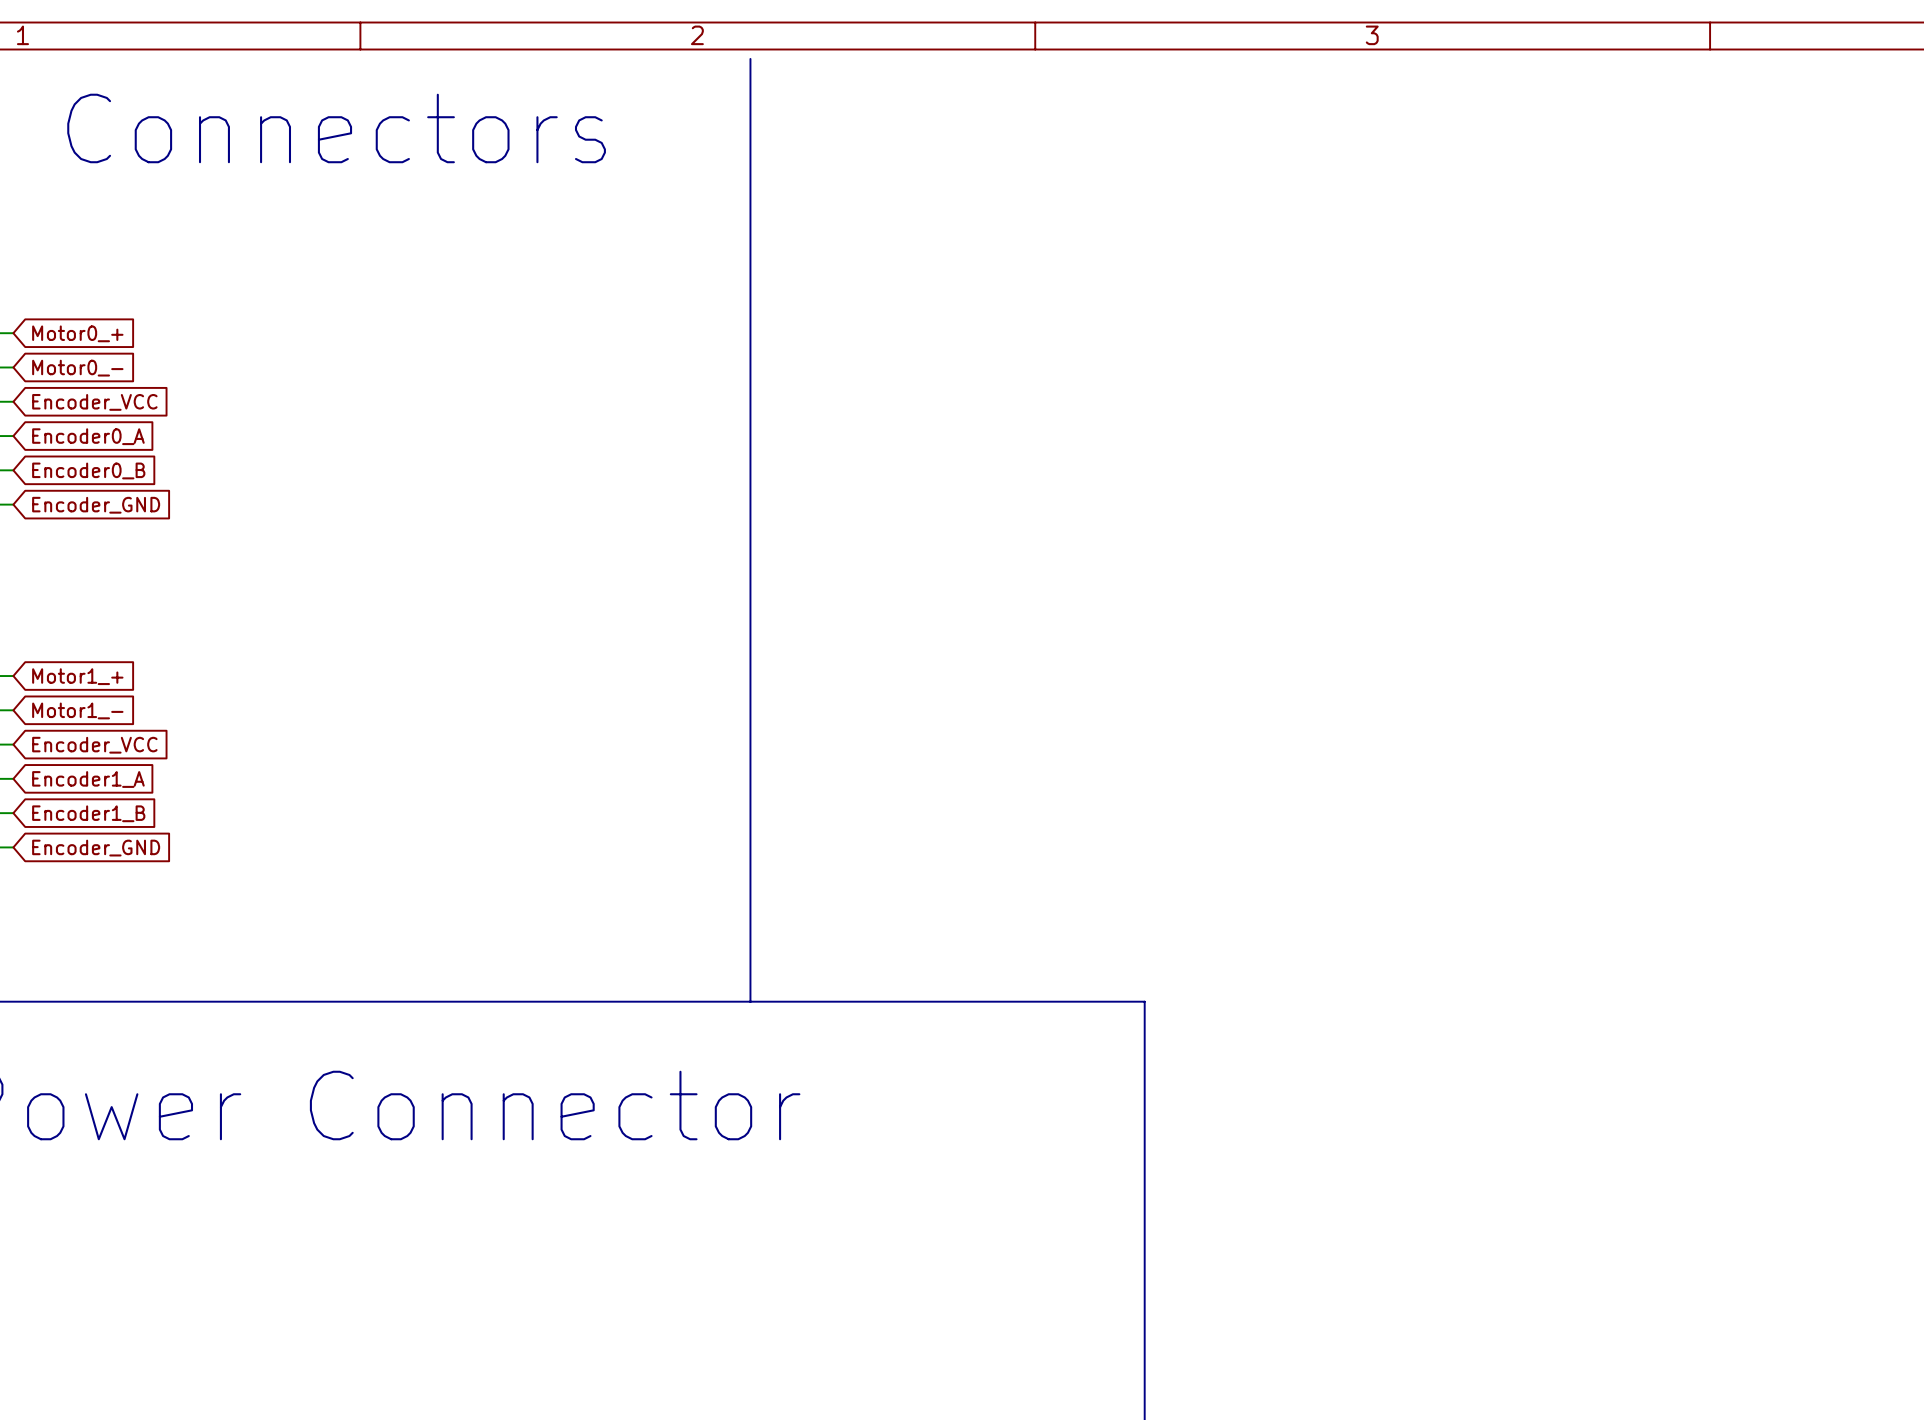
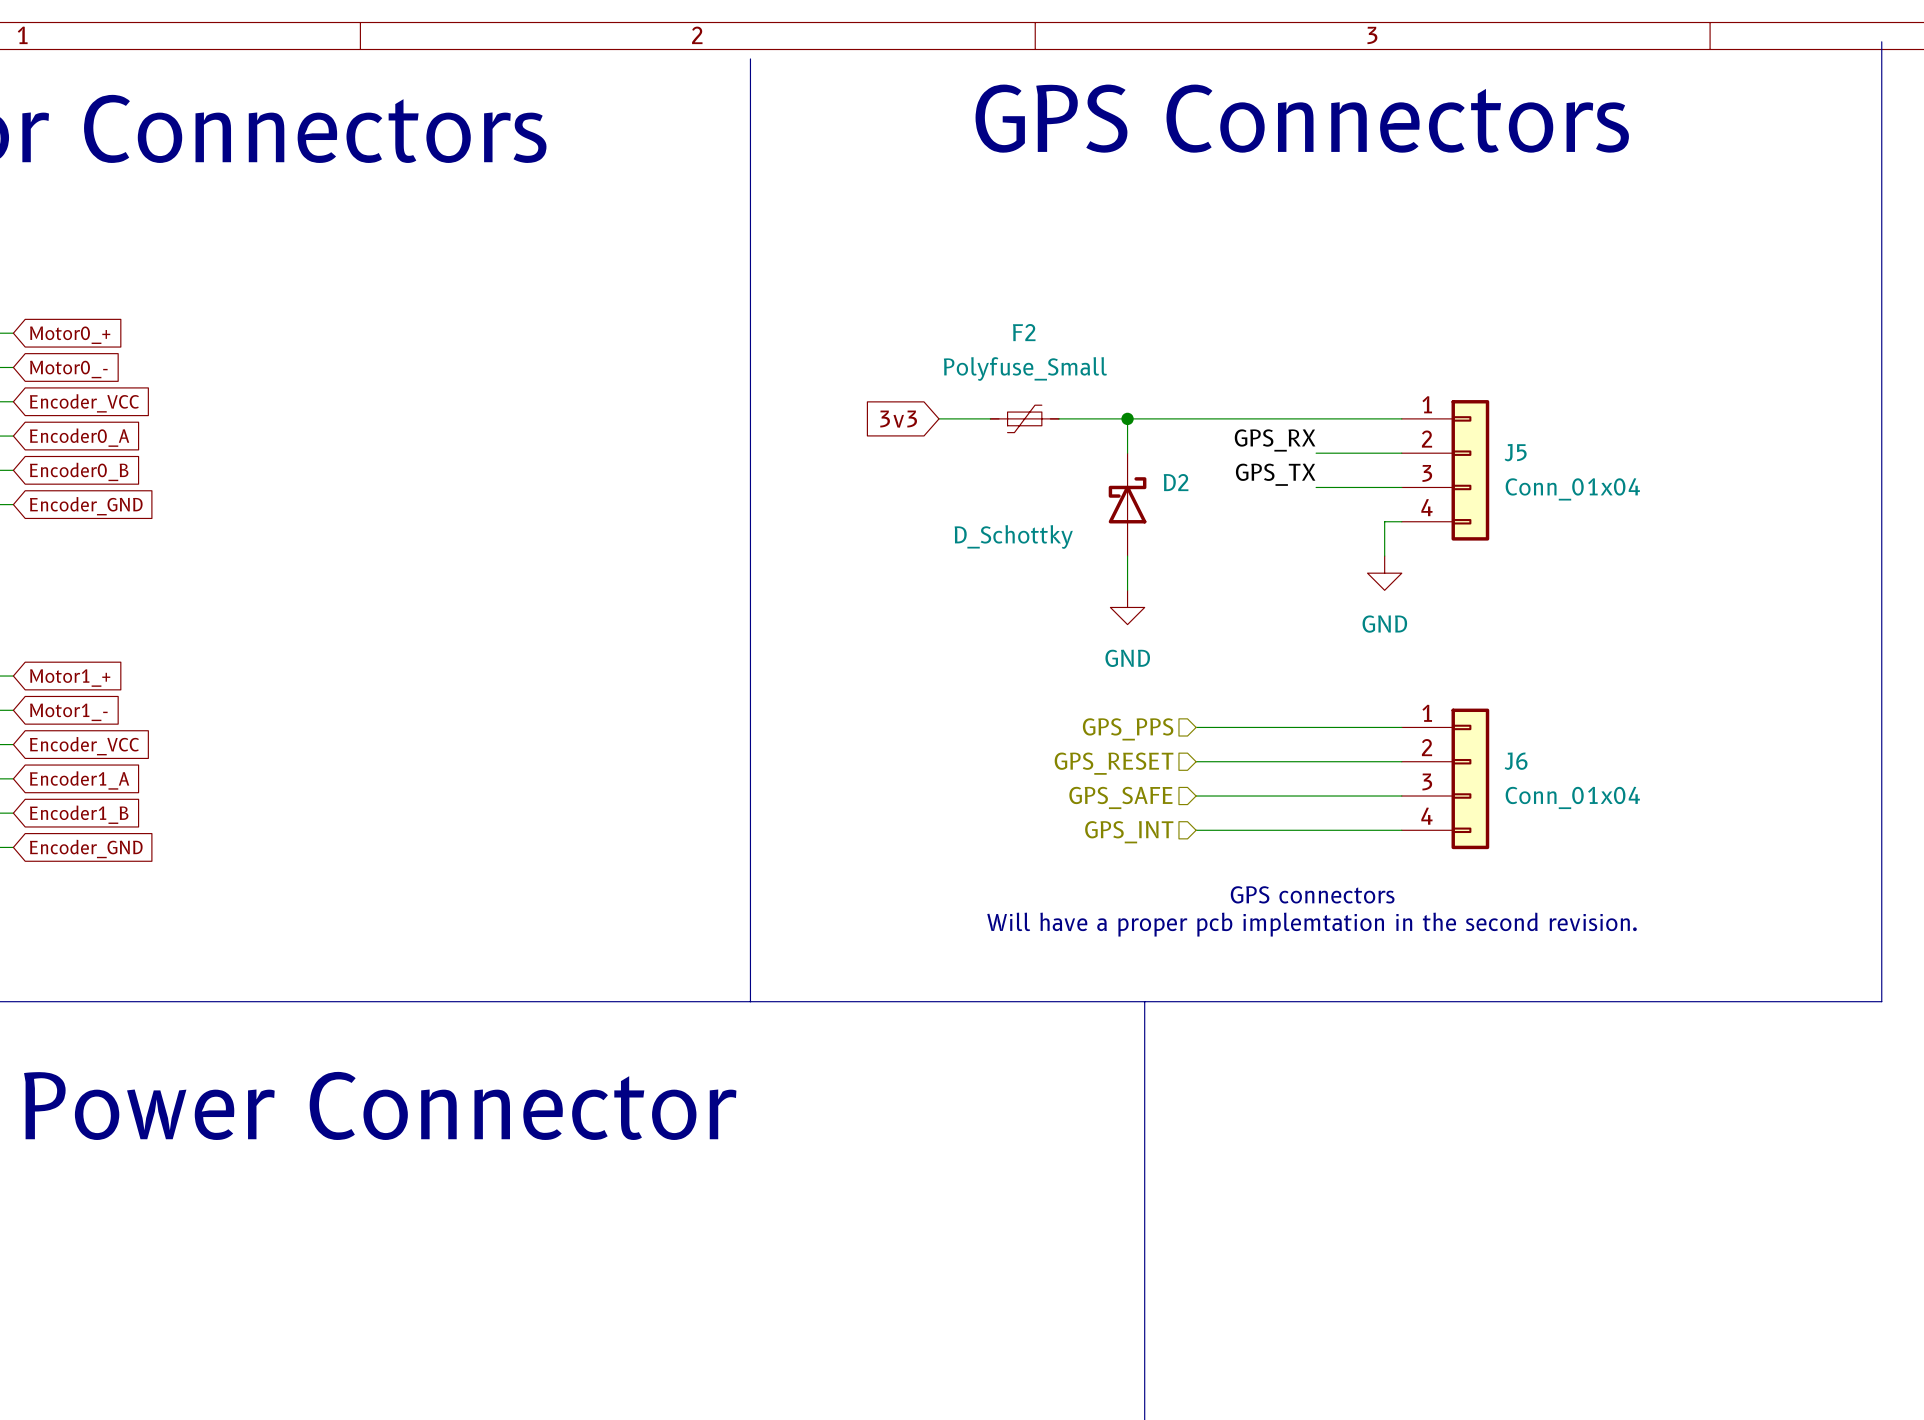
line: none -> (1881, 41) (1881, 1001) (1144, 1001)
text: none -> GPS Connectors (1302, 118)
global label: none -> 3v3 (898, 419)
wire: none -> (939, 418) (990, 418)
F2: none -> Polyfuse_Small (1024, 418)
wire: none -> (1058, 418) (1401, 418)
wire: none -> (1127, 418) (1127, 453)
junction: none -> (1127, 418)
label: none -> GPS_RX (1275, 440)
wire: none -> (1316, 453) (1401, 453)
J5: none -> Conn_01x04 (1445, 470)
label: none -> GPS_TX (1275, 474)
wire: none -> (1316, 487) (1401, 487)
D2: none -> D_Schottky (1127, 504)
wire: none -> (1401, 521) (1384, 521) (1384, 556)
wire: none -> (1127, 556) (1127, 590)
power symbol: none -> GND (1384, 573)
power symbol: none -> GND (1127, 607)
hierarchical label: none -> GPS_PPS (1128, 729)
wire: none -> (1196, 727) (1401, 727)
hierarchical label: none -> GPS_RESET (1114, 763)
wire: none -> (1196, 761) (1401, 761)
J6: none -> Conn_01x04 (1445, 778)
hierarchical label: none -> GPS_SAFE (1120, 797)
wire: none -> (1196, 796) (1401, 796)
hierarchical label: none -> GPS_INT (1129, 832)
wire: none -> (1196, 830) (1401, 830)
text: none -> GPS connectors (1312, 894)
text: none -> Will have a proper pcb implemtation in the second revision. (1312, 924)

